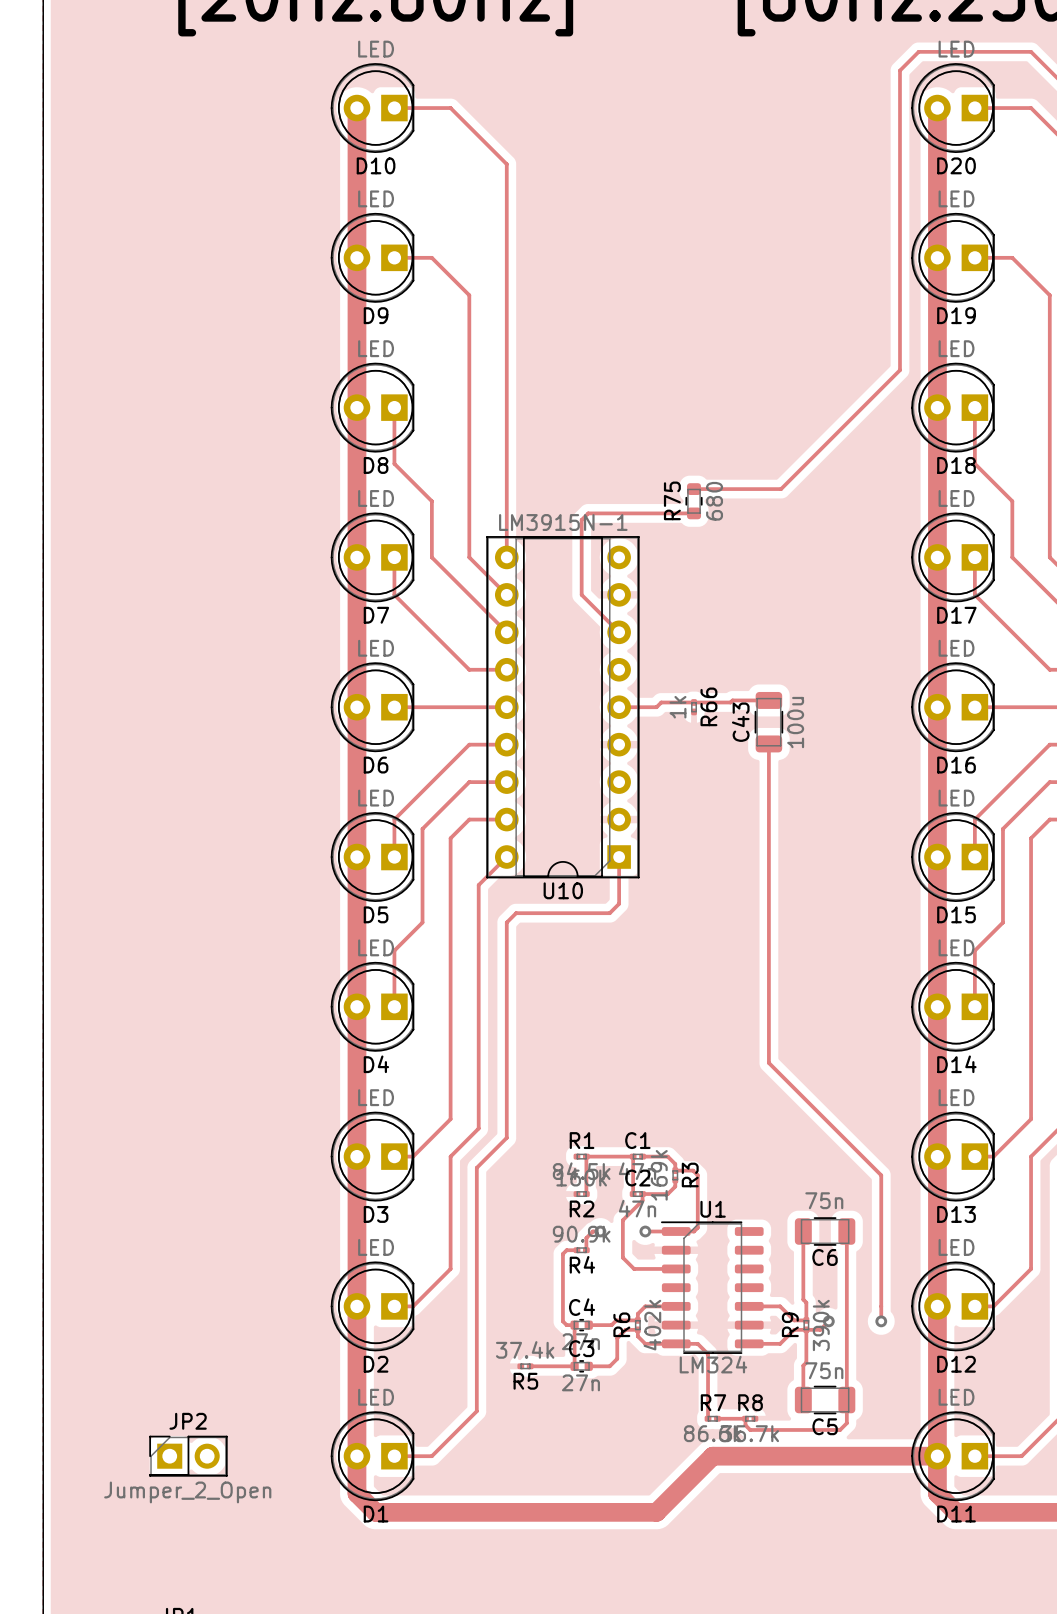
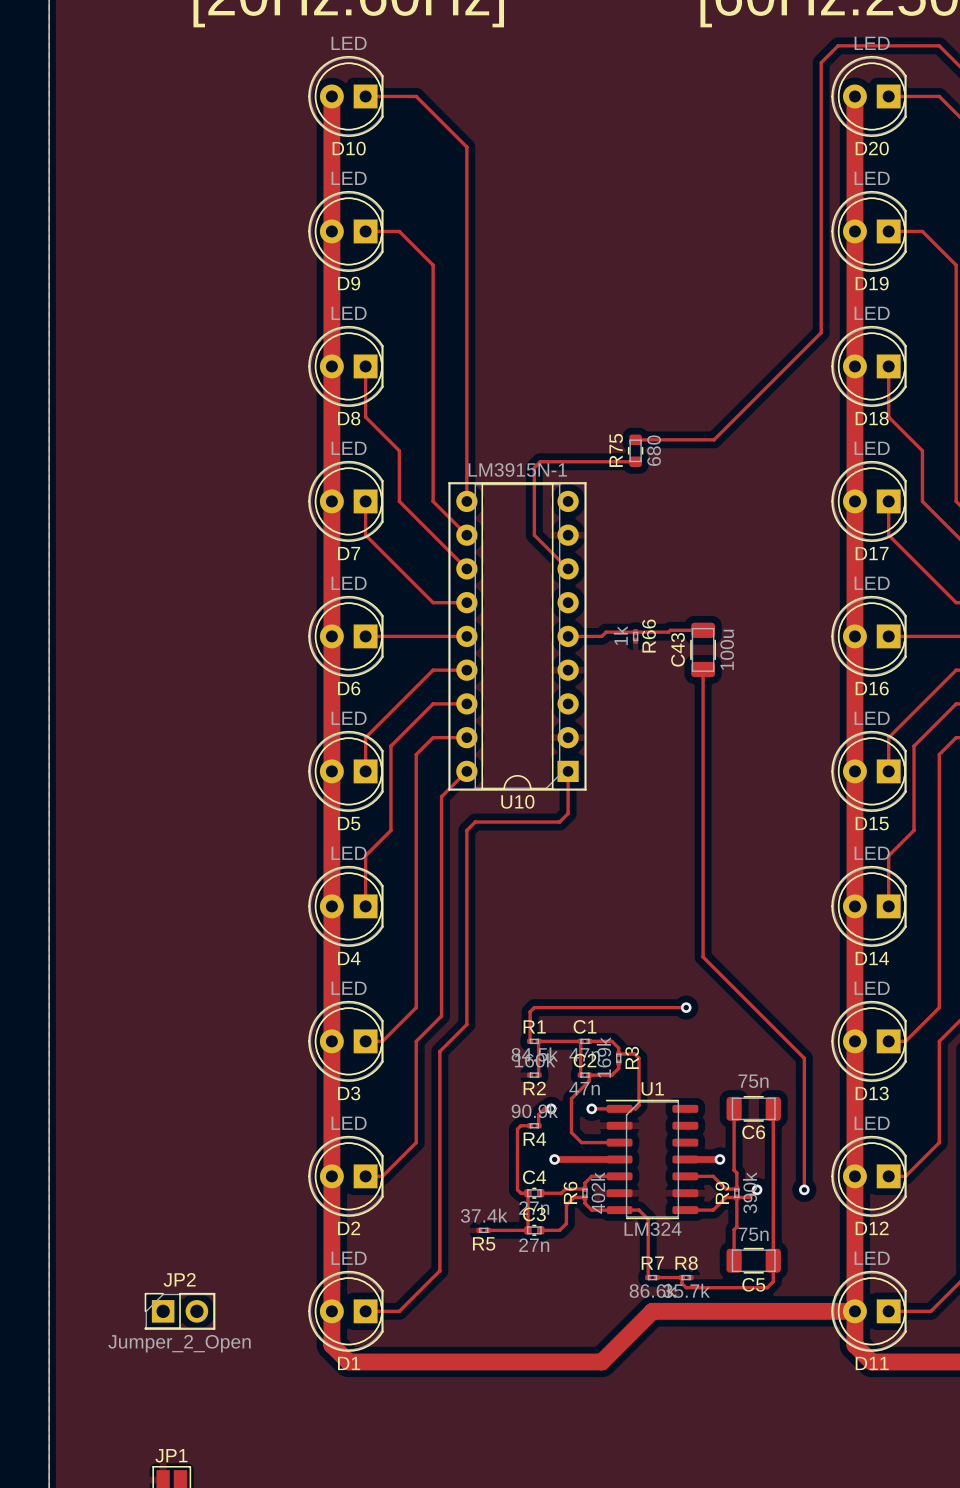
track: none -> (686, 1007) (534, 1007) (530, 1011) (530, 1041)
via: none -> (686, 1007)
track: none -> (554, 1159) (619, 1159)
via: none -> (554, 1159)
track: none -> (685, 1159) (719, 1159)
via: none -> (719, 1159)

